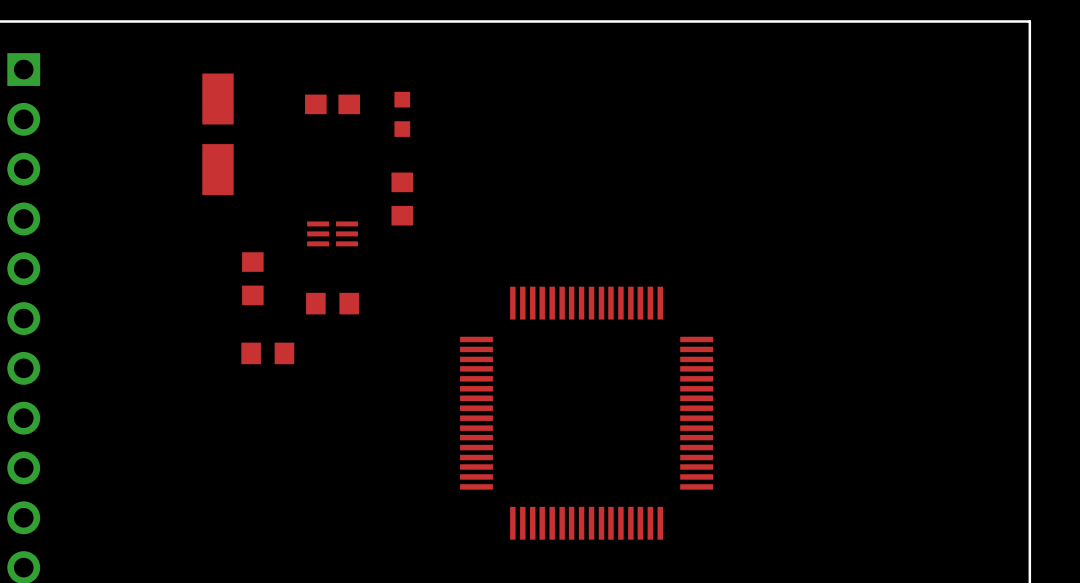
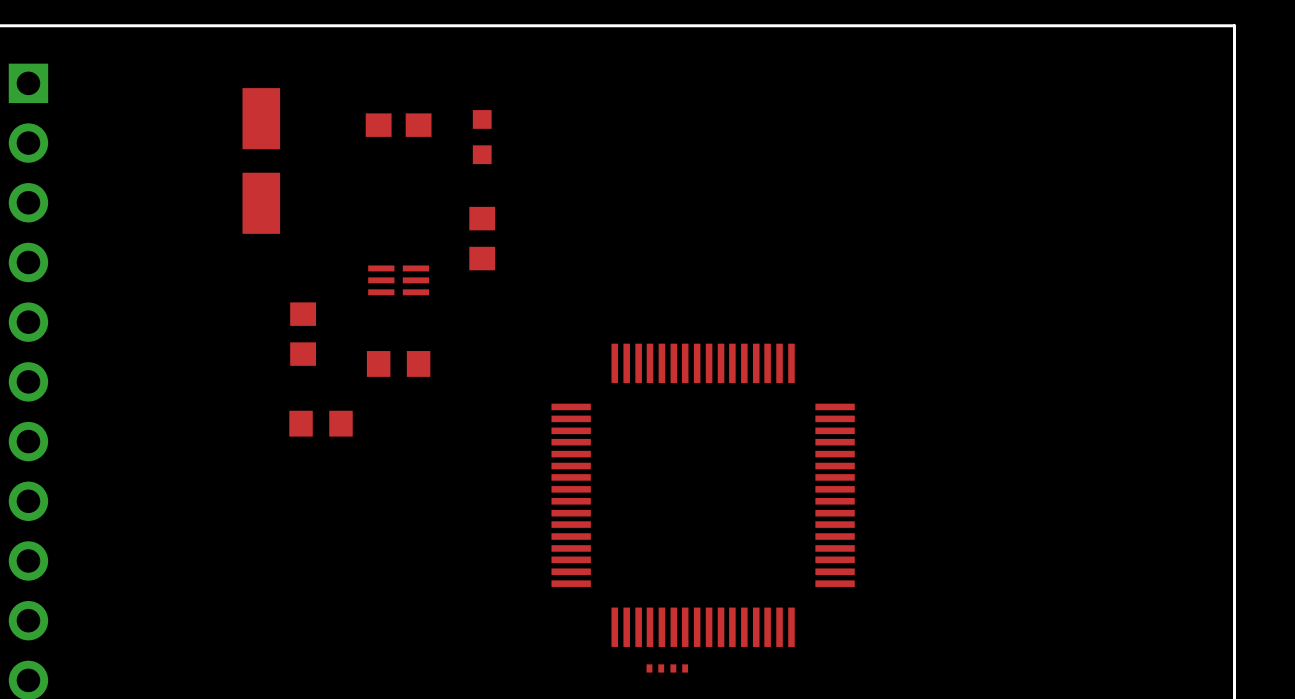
part: none -> (655, 668)
part: none -> (679, 668)

